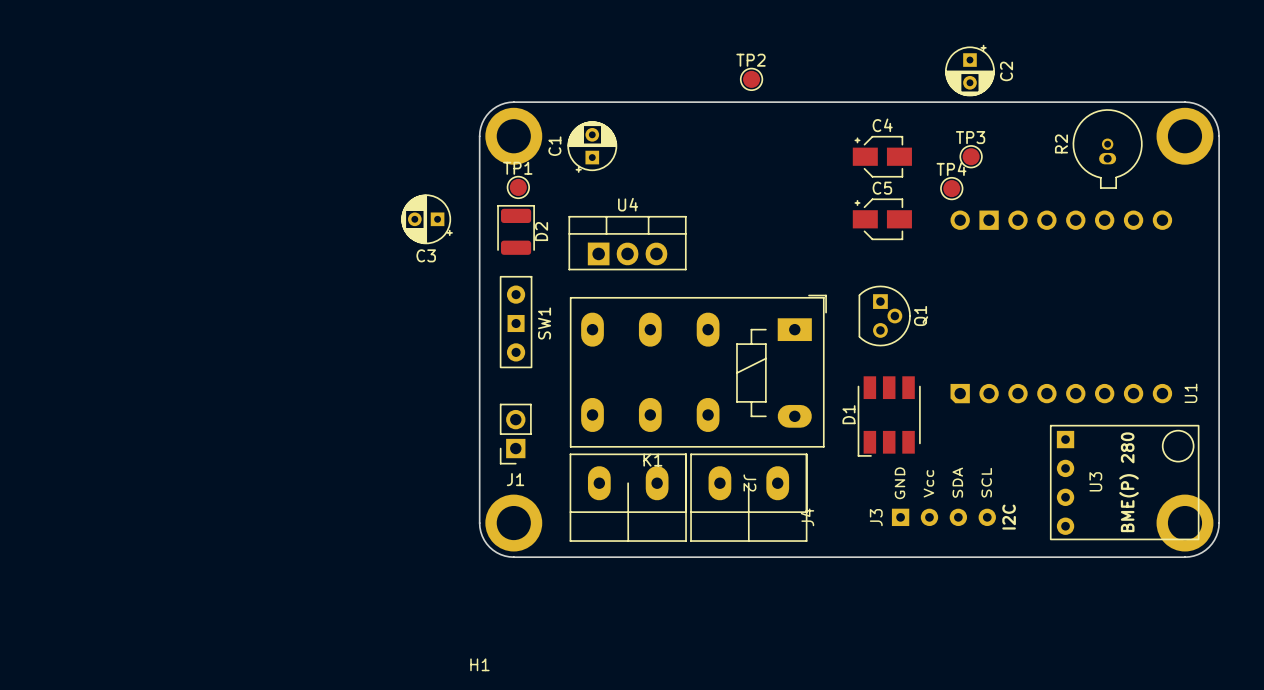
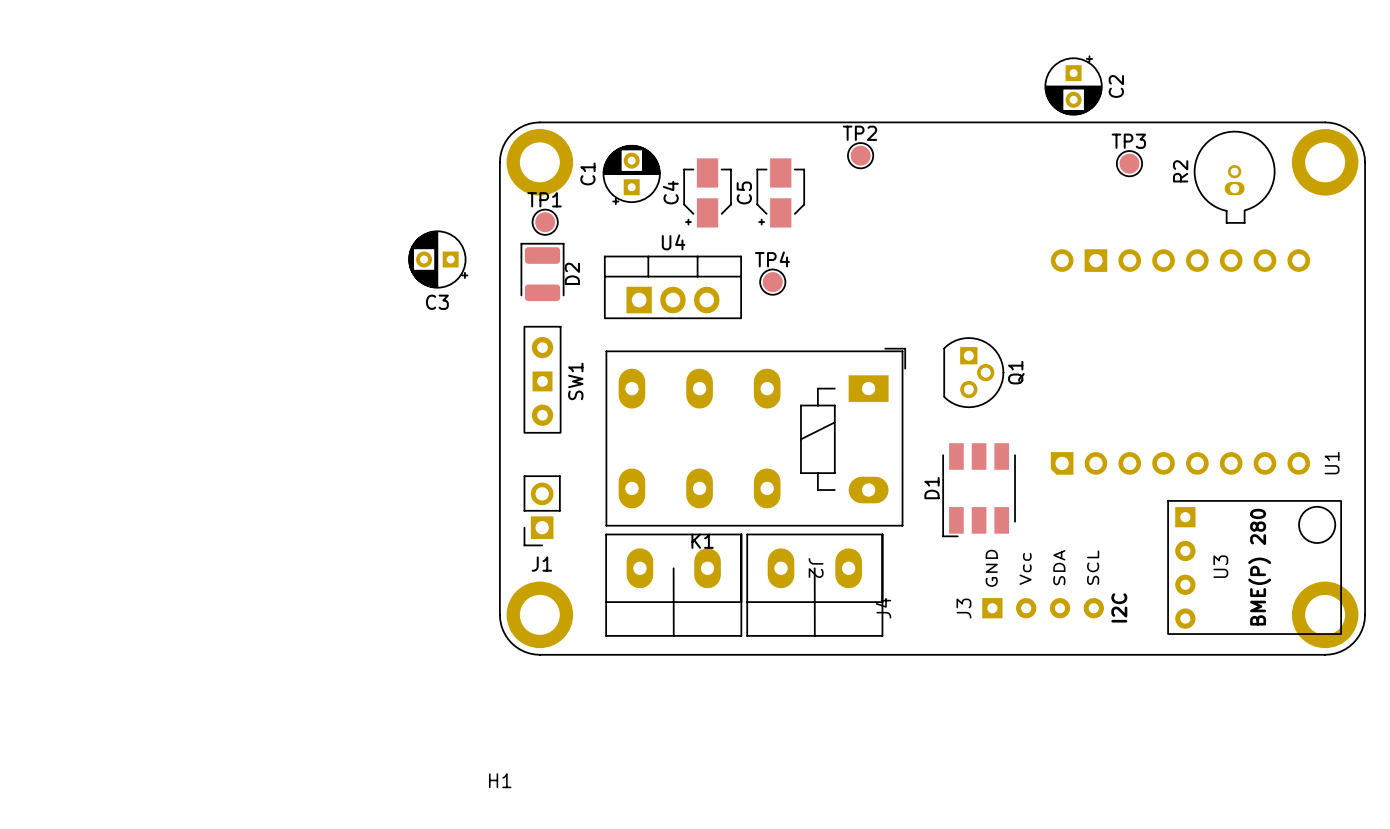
TP2 position: (751, 79) -> (860, 155)
C4 rotation: 0° (882, 156) -> 90° counterclockwise (707, 192)
C4 position: (882, 156) -> (707, 192)
TP3 position: (971, 156) -> (1129, 163)
TP4 position: (951, 188) -> (772, 282)
C5 rotation: 0° (882, 219) -> 90° counterclockwise (780, 192)
C5 position: (882, 219) -> (780, 192)

